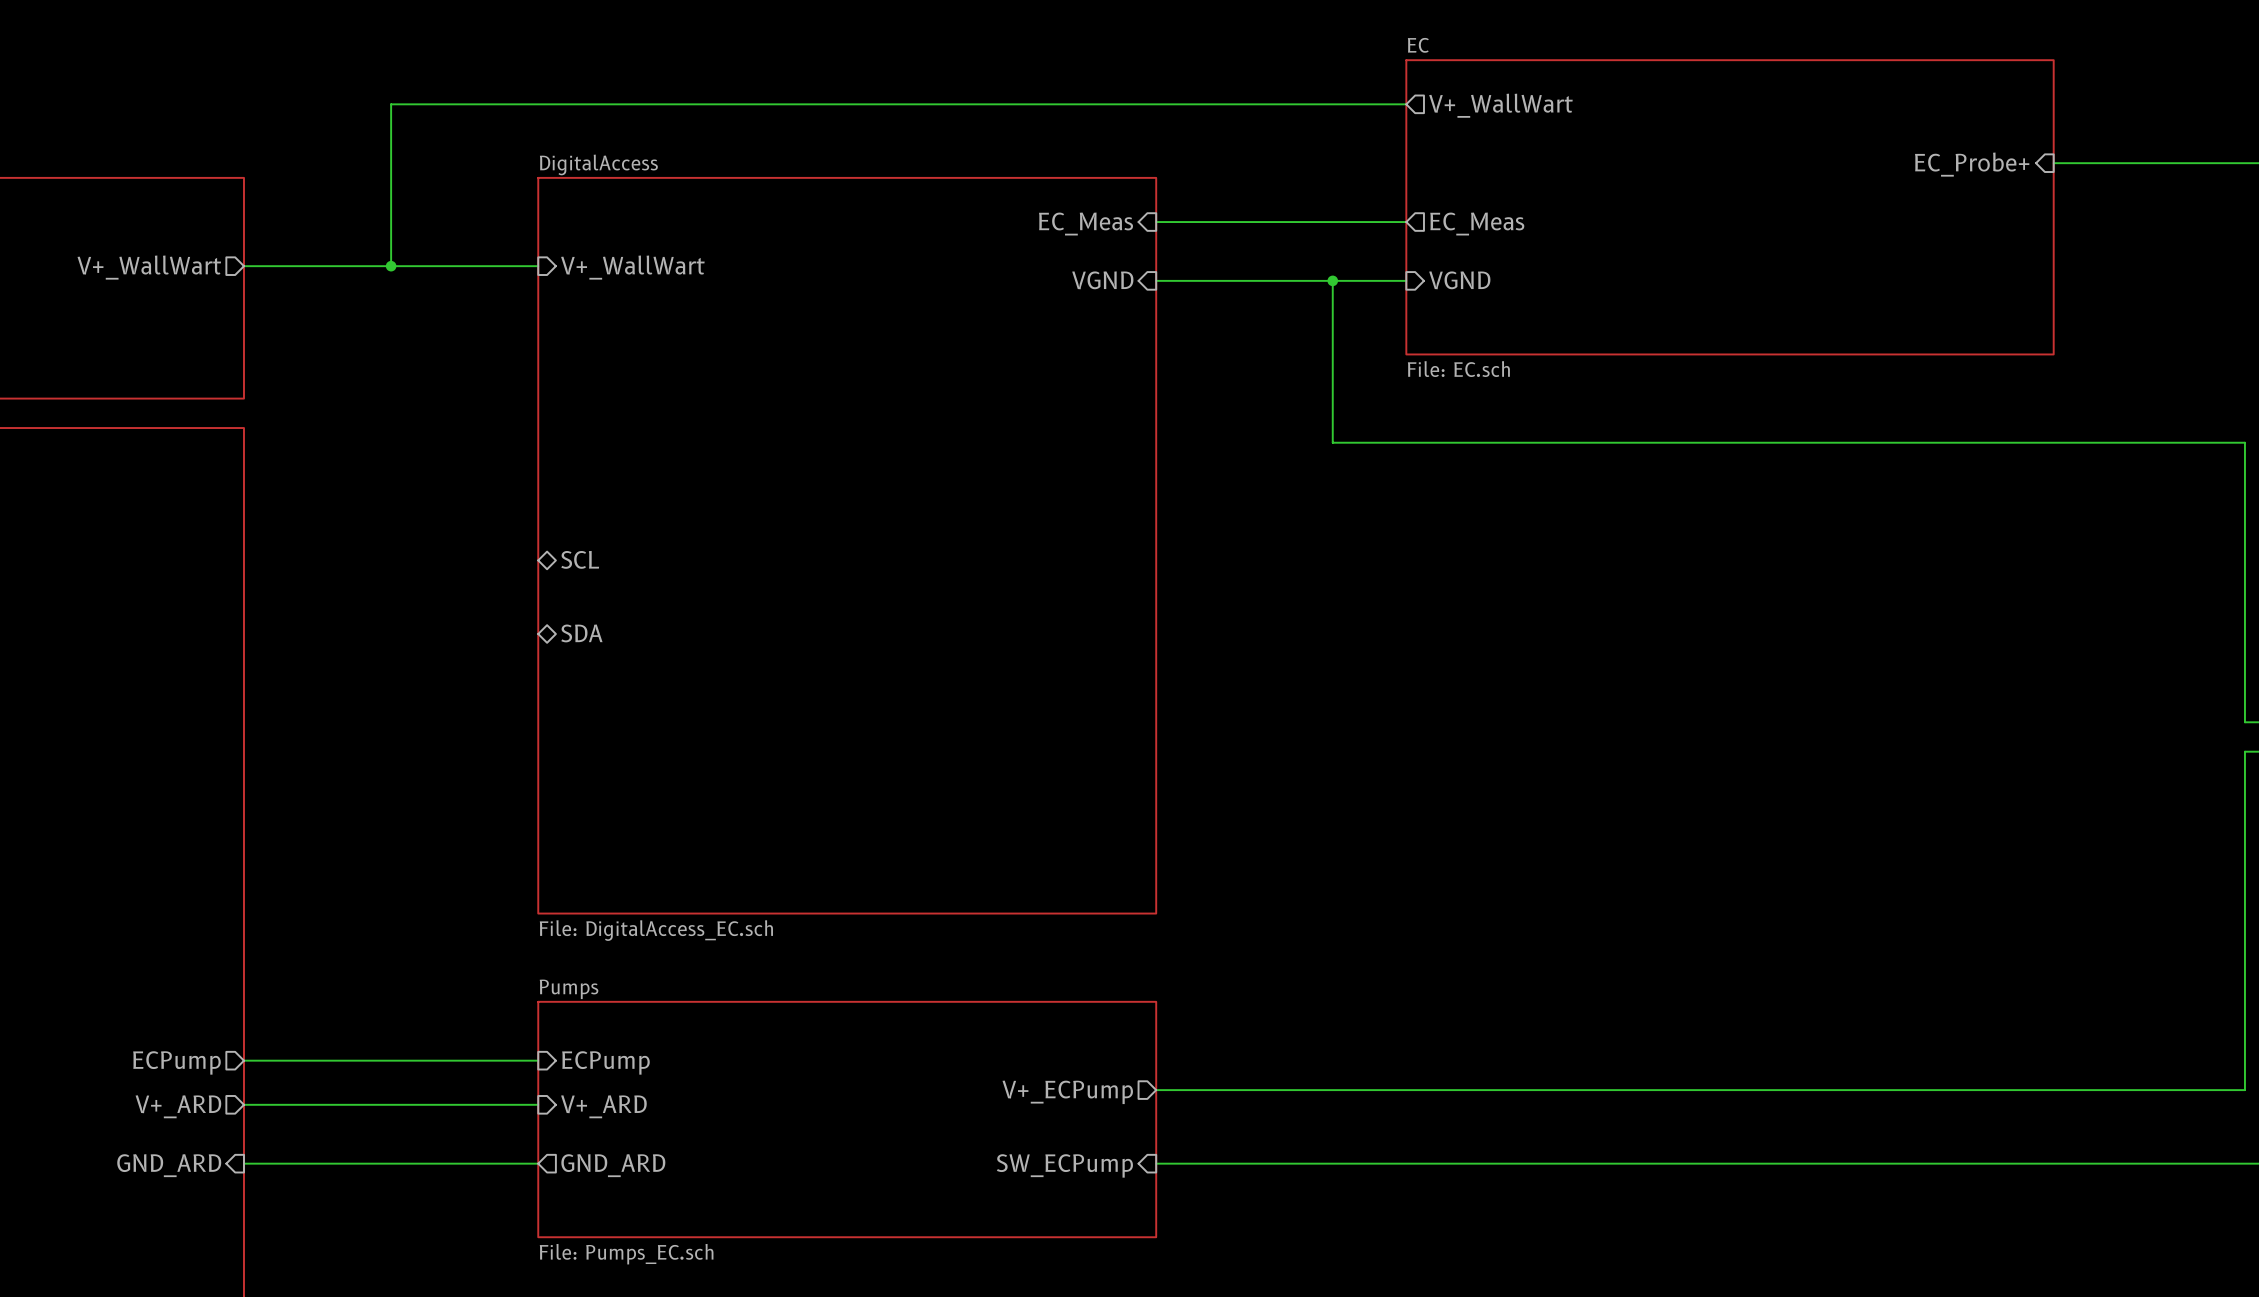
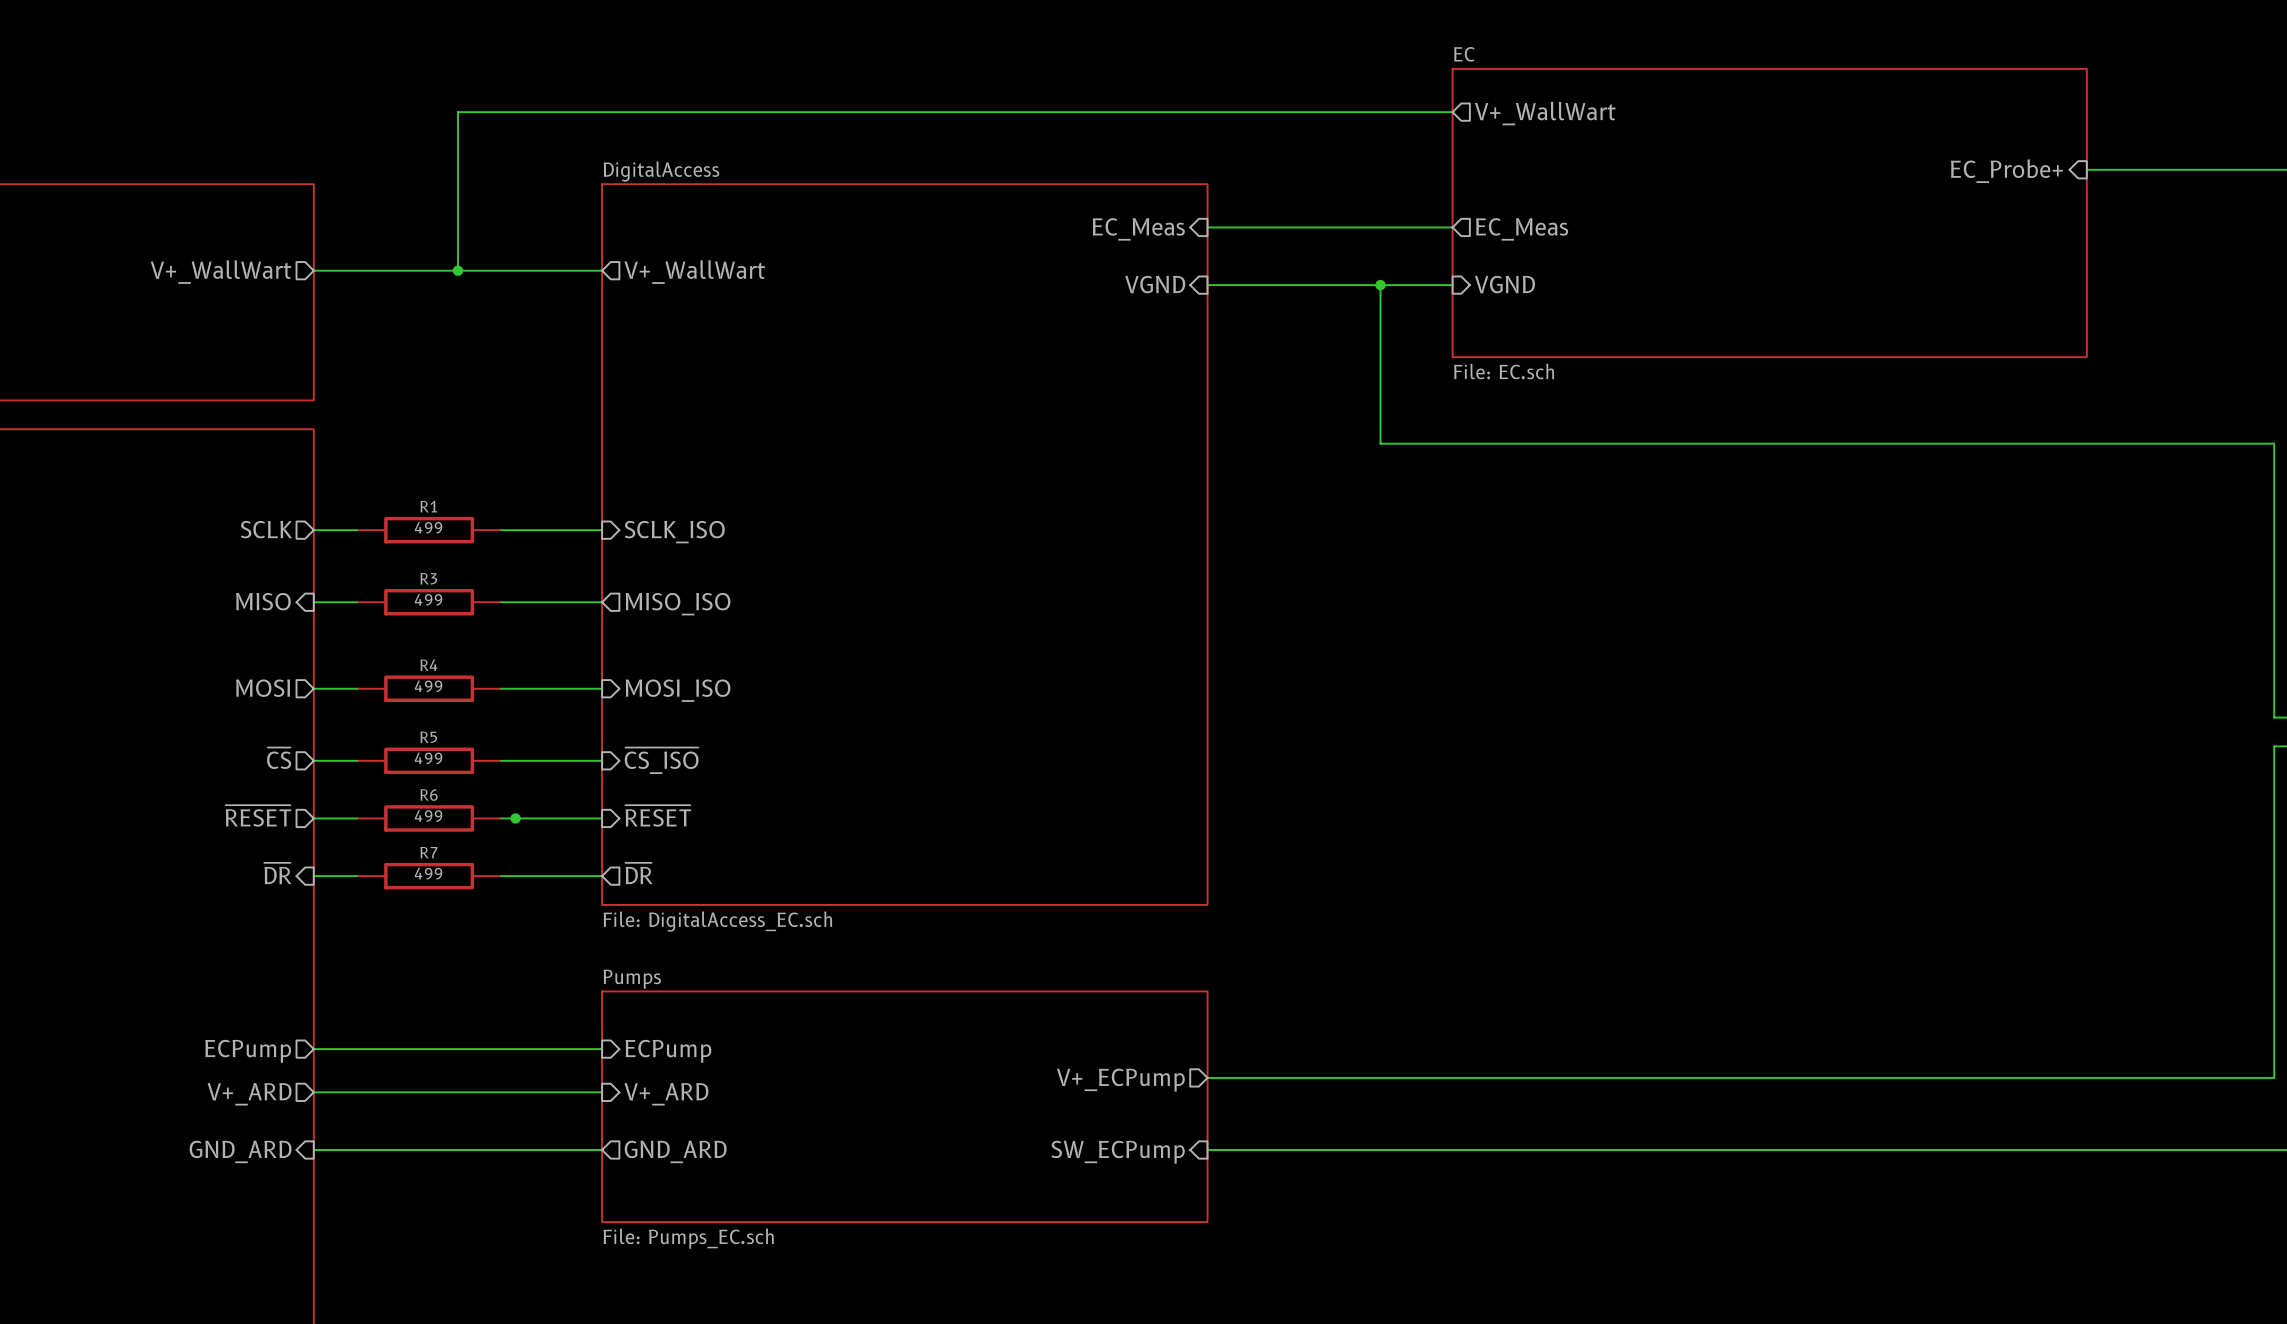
sheet pin shape: input (632, 267) -> output (694, 272)
sheet pin: none -> SCLK (266, 529)
wire: none -> (313, 530) (357, 530)
R1: none -> 499 (429, 530)
wire: none -> (501, 530) (602, 530)
sheet pin: none -> SCLK_ISO (674, 532)
sheet pin: SCL (580, 559) -> none
sheet pin: none -> MISO (263, 601)
wire: none -> (313, 602) (357, 602)
R3: none -> 499 (429, 602)
wire: none -> (501, 602) (602, 602)
sheet pin: none -> MISO_ISO (678, 604)
sheet pin: SDA (581, 633) -> none
sheet pin: none -> MOSI (263, 688)
wire: none -> (313, 688) (357, 688)
R4: none -> 499 (429, 688)
wire: none -> (501, 688) (602, 688)
sheet pin: none -> MOSI_ISO (678, 690)
sheet pin: none -> ~{CS} (279, 758)
wire: none -> (313, 760) (357, 760)
R5: none -> 499 (429, 760)
wire: none -> (501, 760) (602, 760)
sheet pin: none -> ~{CS_ISO} (661, 760)
sheet pin: none -> ~{RESET} (258, 815)
sheet pin: none -> ~{RESET} (658, 815)
wire: none -> (313, 818) (357, 818)
R6: none -> 499 (429, 818)
wire: none -> (501, 818) (602, 818)
junction: none -> (515, 818)
sheet pin: none -> ~{DR} (277, 873)
sheet pin: none -> ~{DR} (639, 873)
wire: none -> (313, 876) (357, 876)
R7: none -> 499 (429, 876)
wire: none -> (501, 876) (602, 876)

